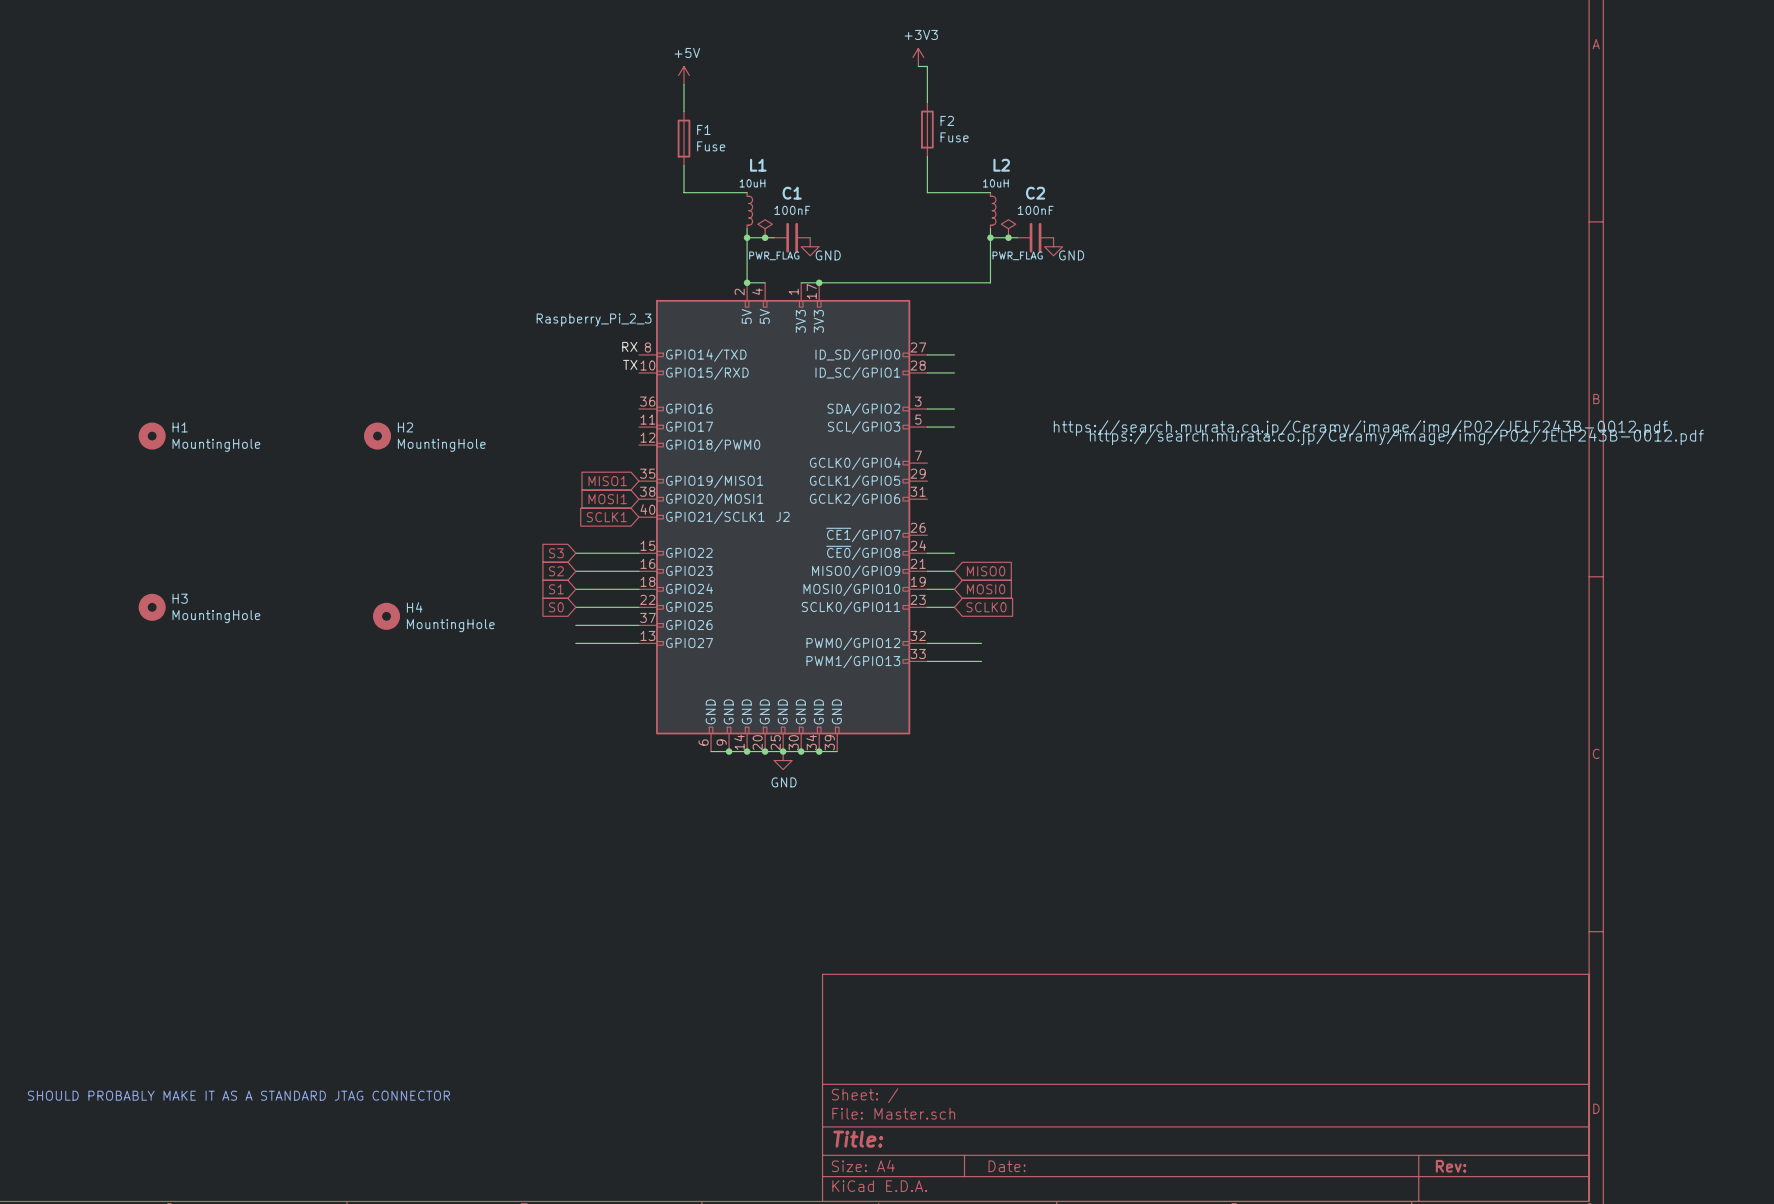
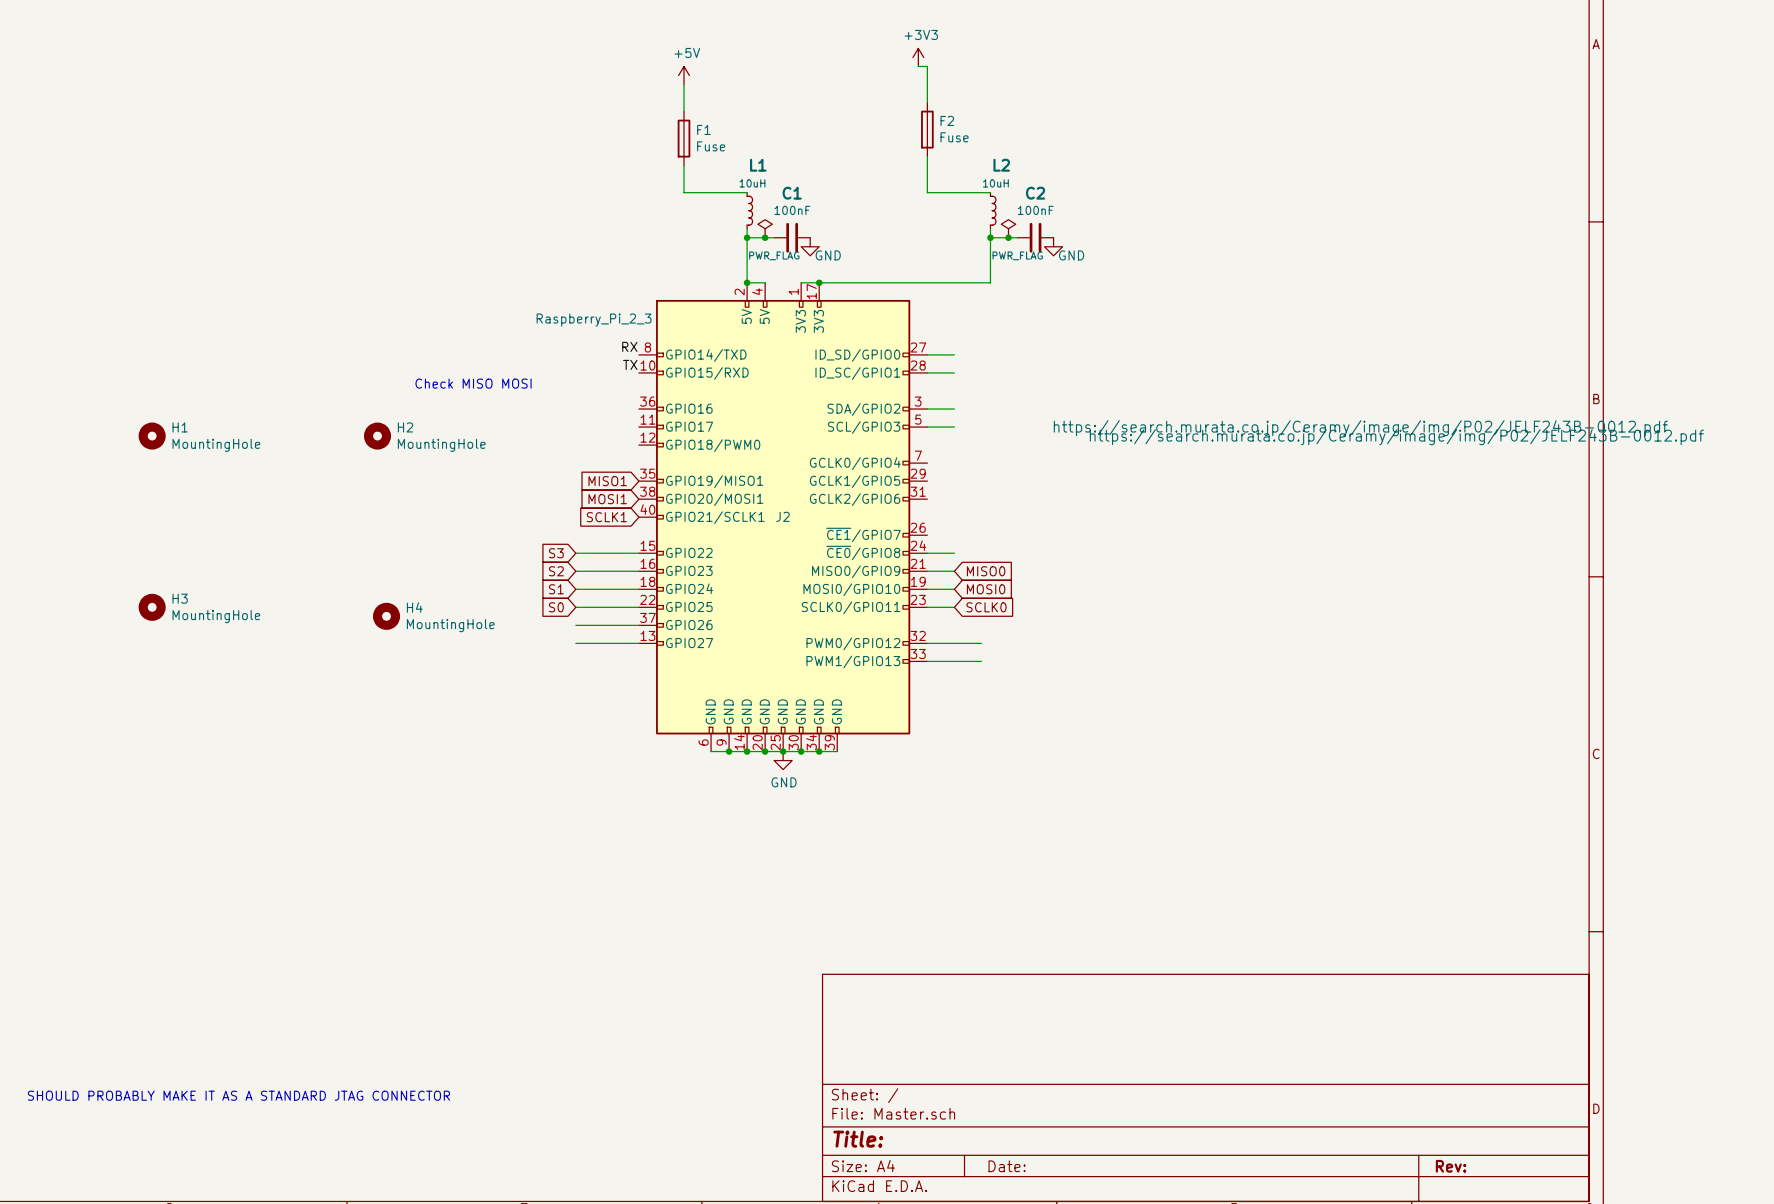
text: none -> Check MISO MOSI (473, 383)

